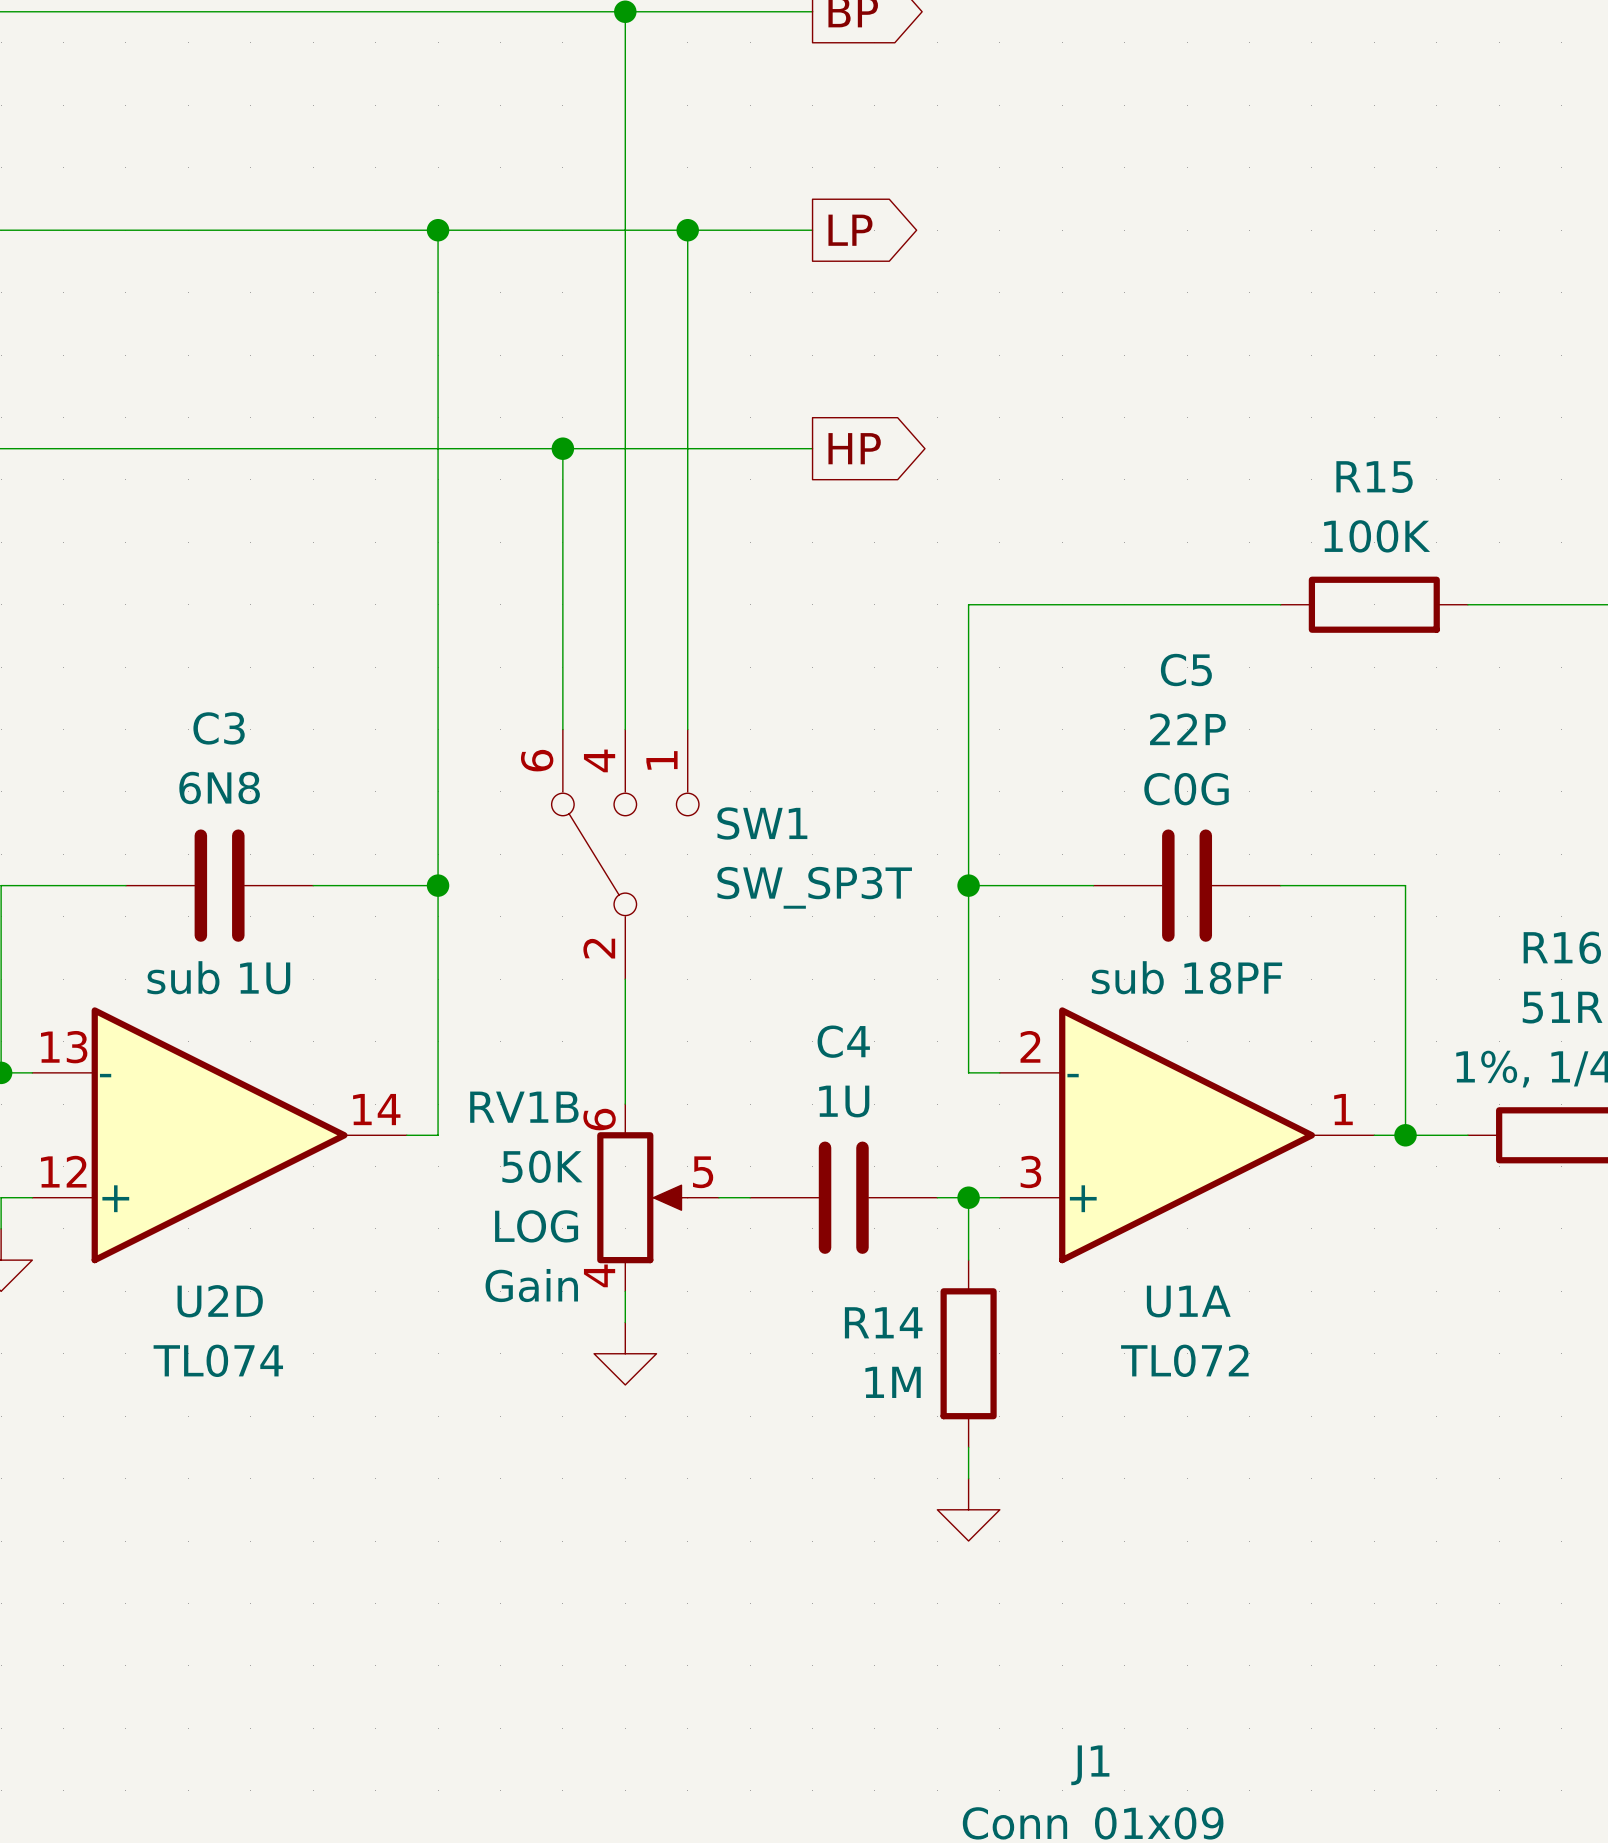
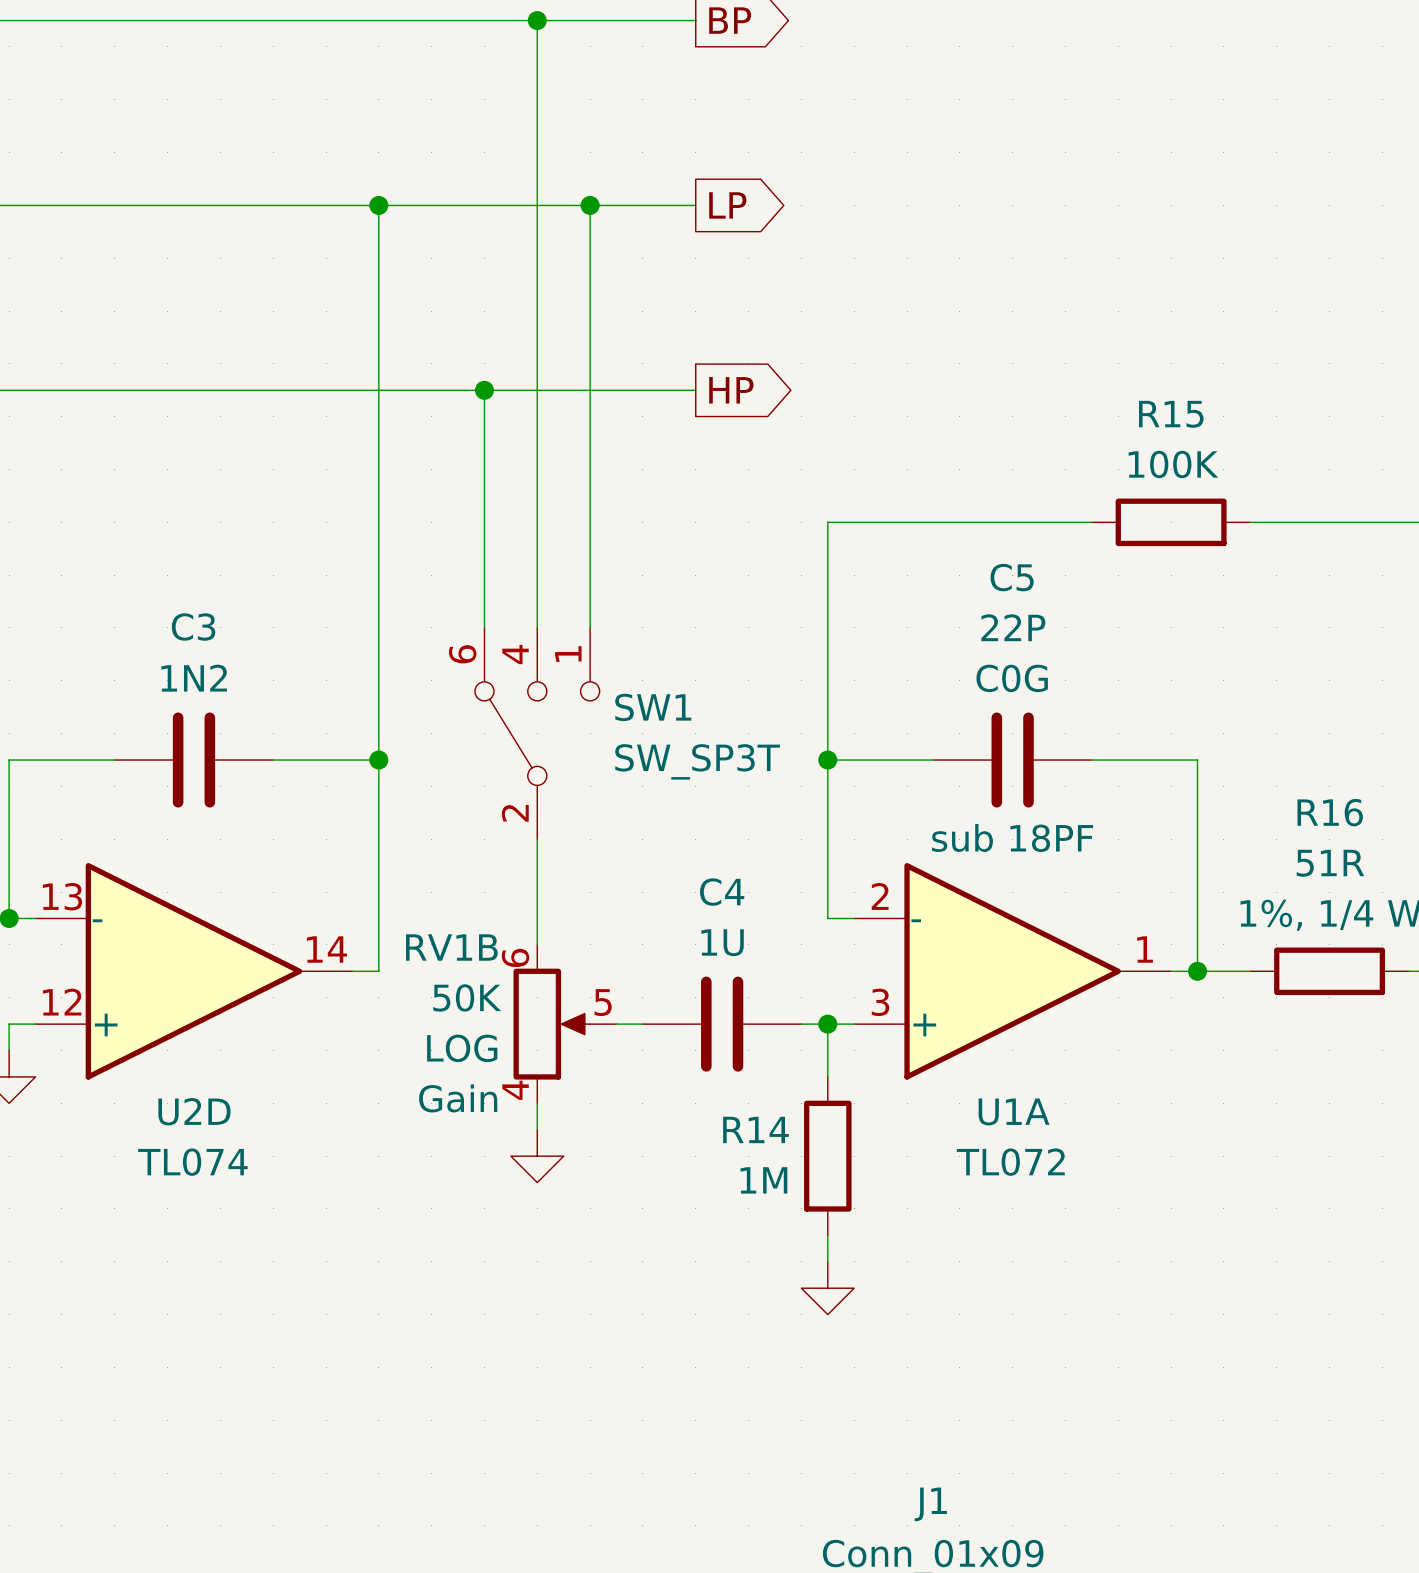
C3 value: 6N8 (219, 788) -> 1N2 (194, 678)
C3 text: sub 1U (218, 977) -> none

